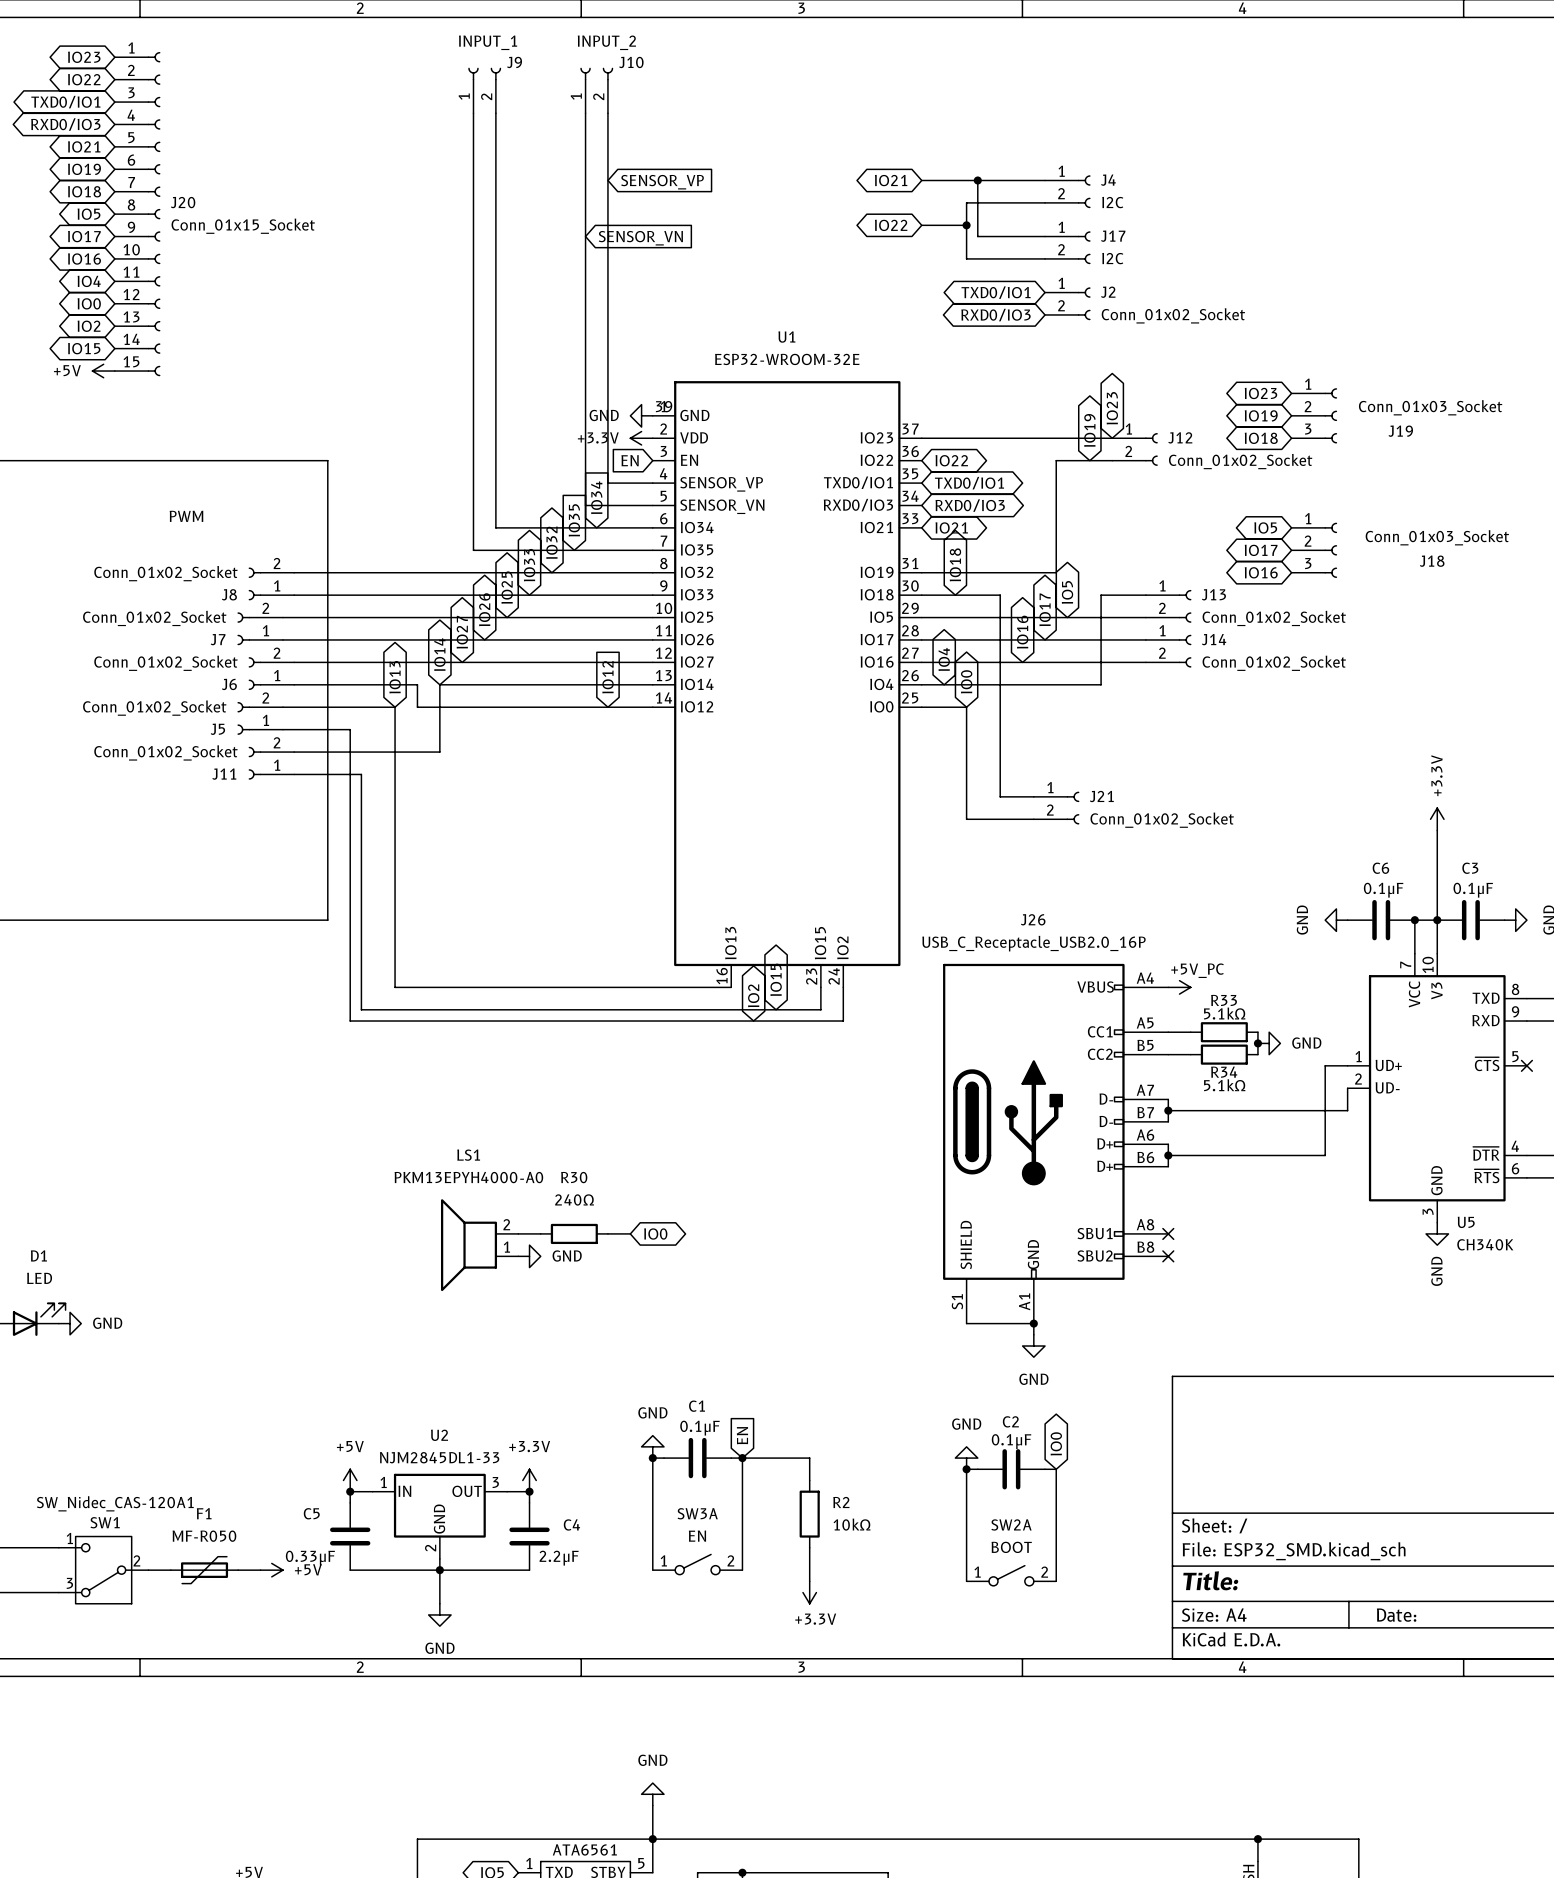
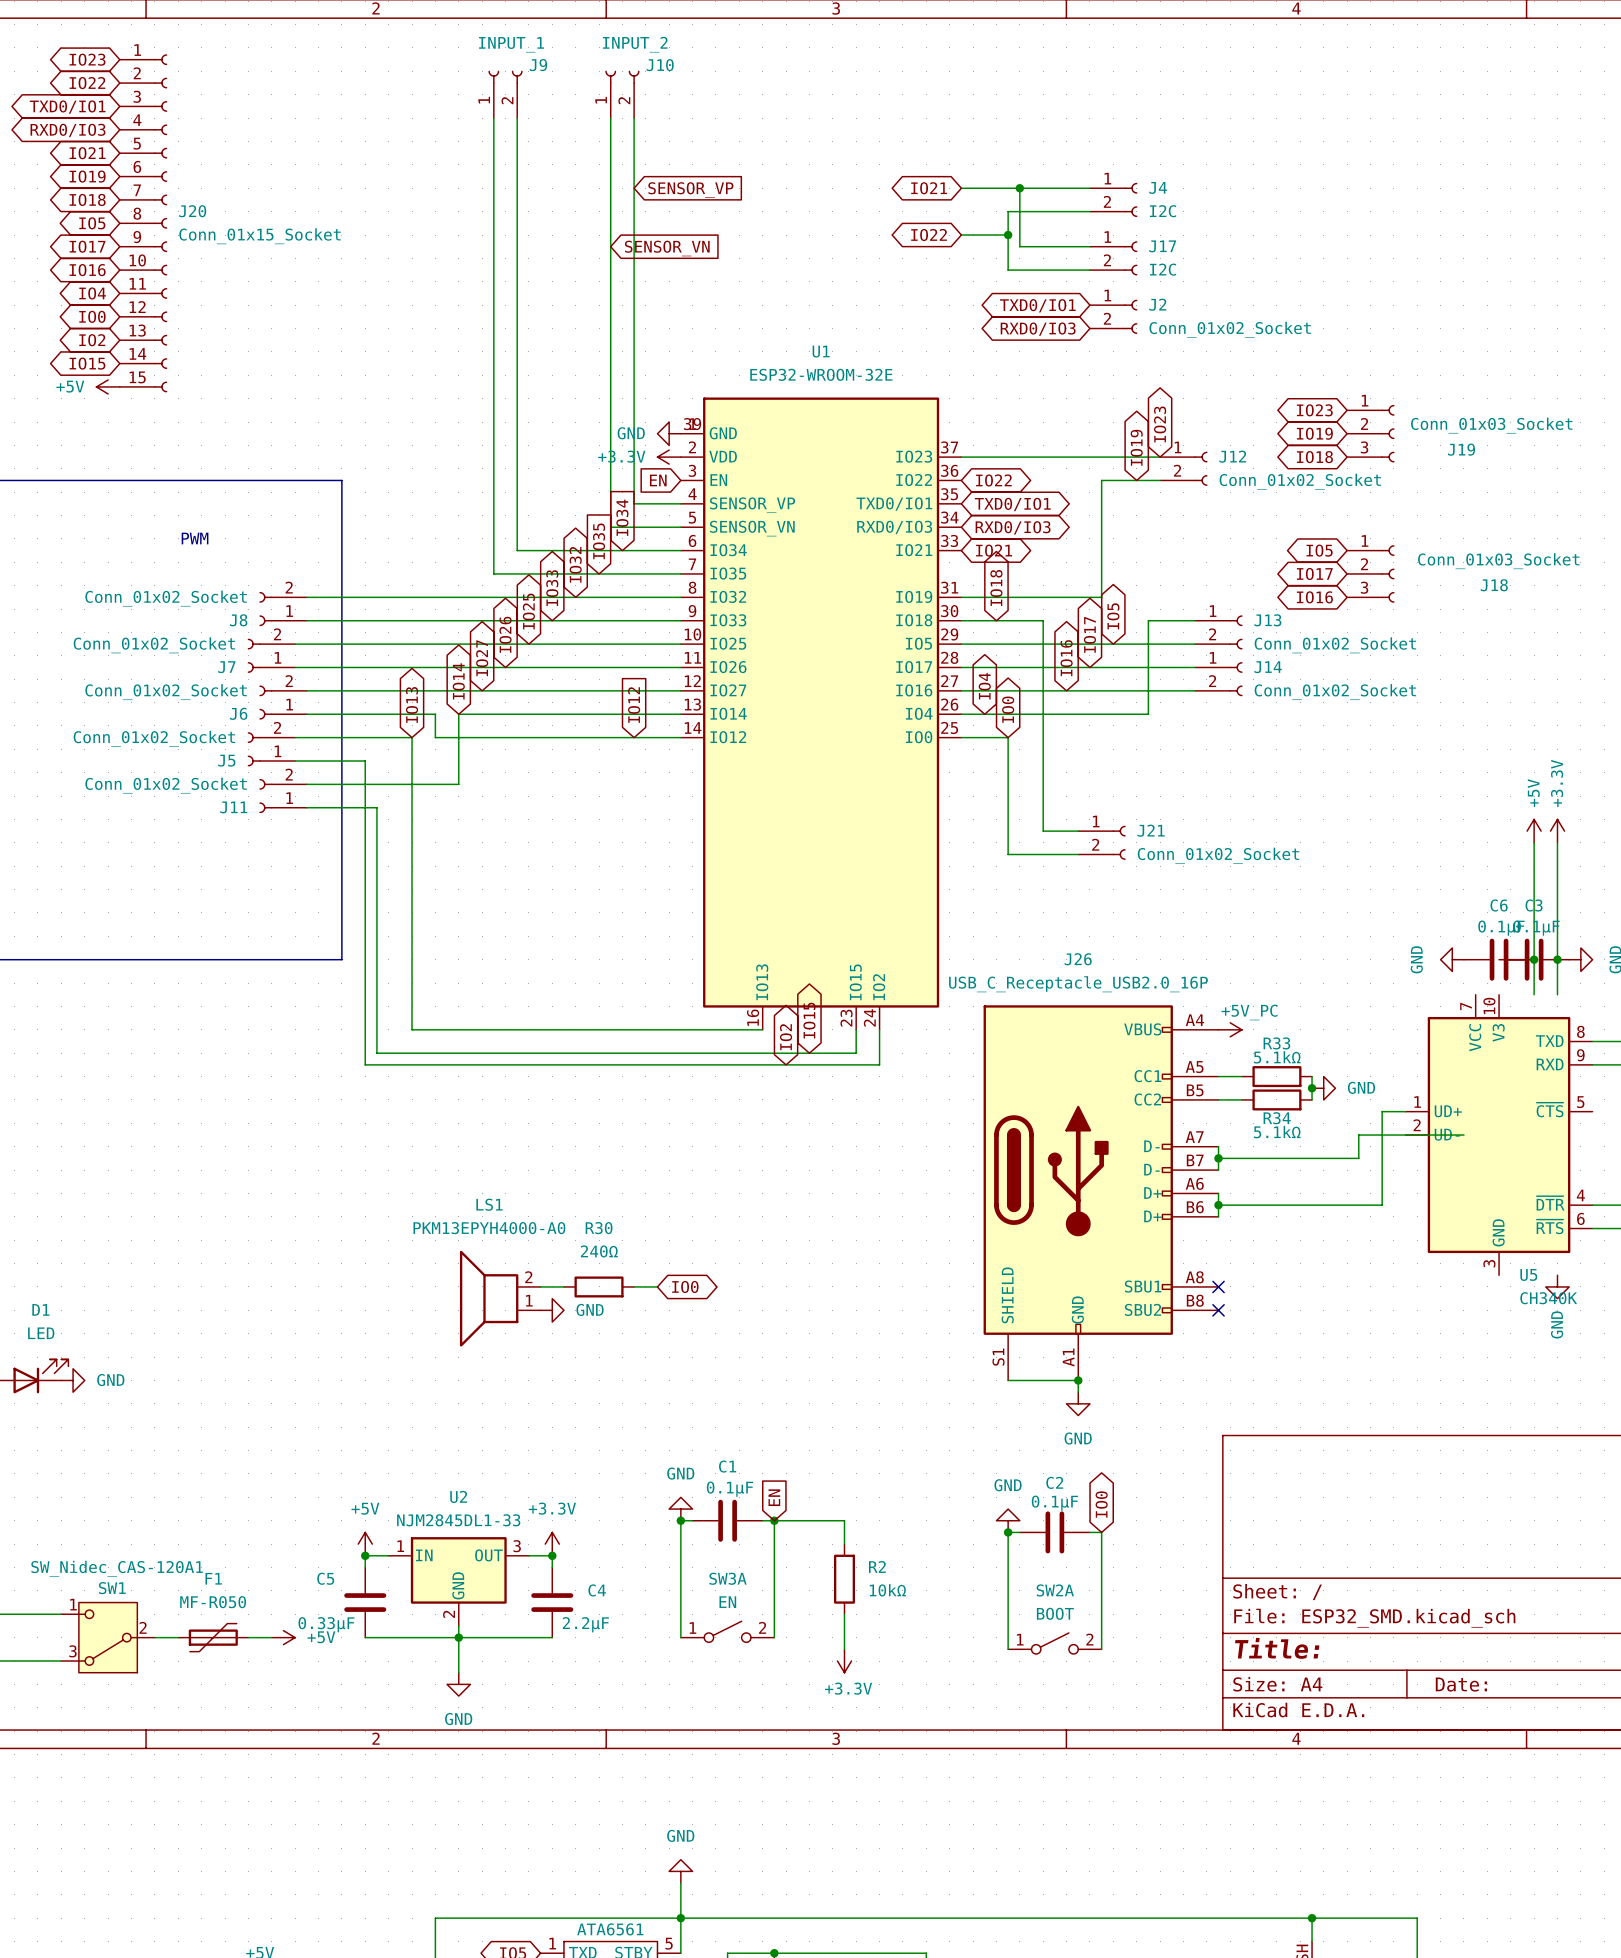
power symbol: none -> +5V (1534, 831)
wire: none -> (1534, 842) (1534, 994)
wire: none -> (1557, 842) (1557, 994)
power symbol position: +3.3V (1437, 819) -> +3.3V (1557, 831)
wire: (1437, 830) (1437, 953) -> none
power symbol position: GND (1336, 920) -> GND (1452, 959)
C6 position: (1381, 920) -> (1499, 959)
junction: (1414, 920) -> none
wire: (1437, 920) (1414, 920) (1414, 953) -> none
junction: (1437, 920) -> none
junction: none -> (1534, 959)
junction: none -> (1557, 959)
no-connect mark: (1526, 1065) -> none
wire: (1347, 1088) (1347, 1110) (1302, 1110) -> (1463, 1135) (1358, 1135) (1358, 1158)
power symbol position: GND (1437, 1233) -> GND (1557, 1286)

